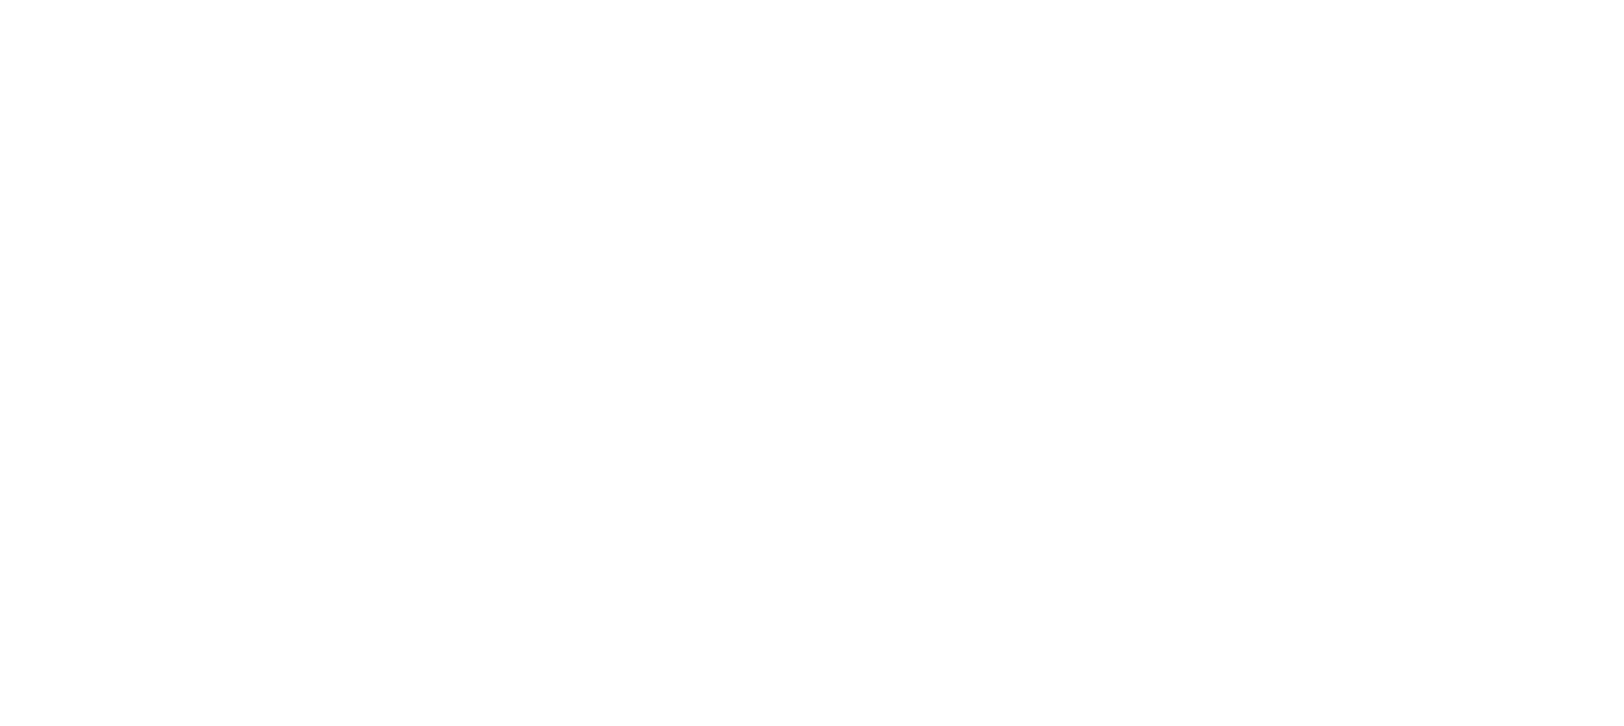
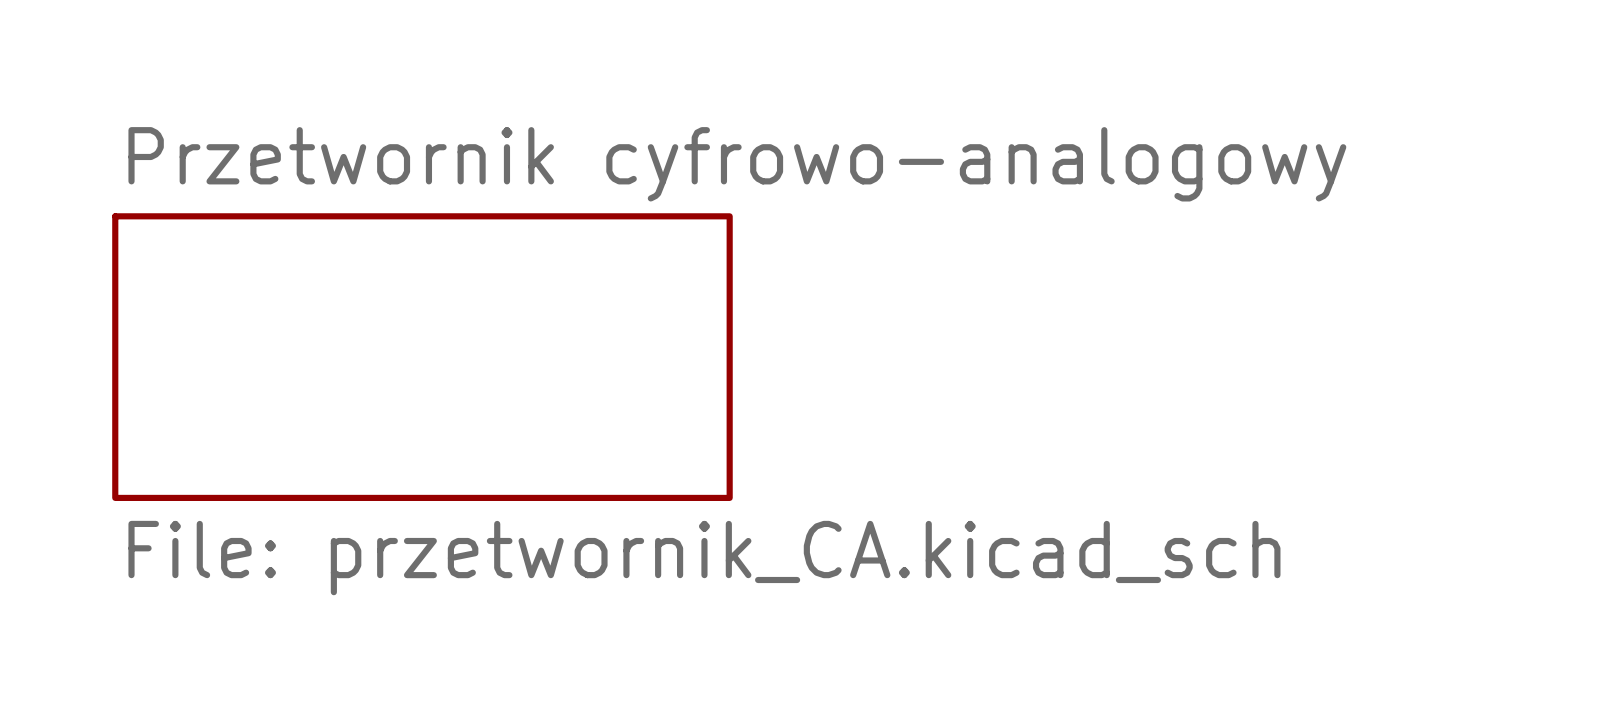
sheet Przetwornik cyfrowo-analogowy: none -> File: przetwornik_CA.kicad_sch (422, 357)

